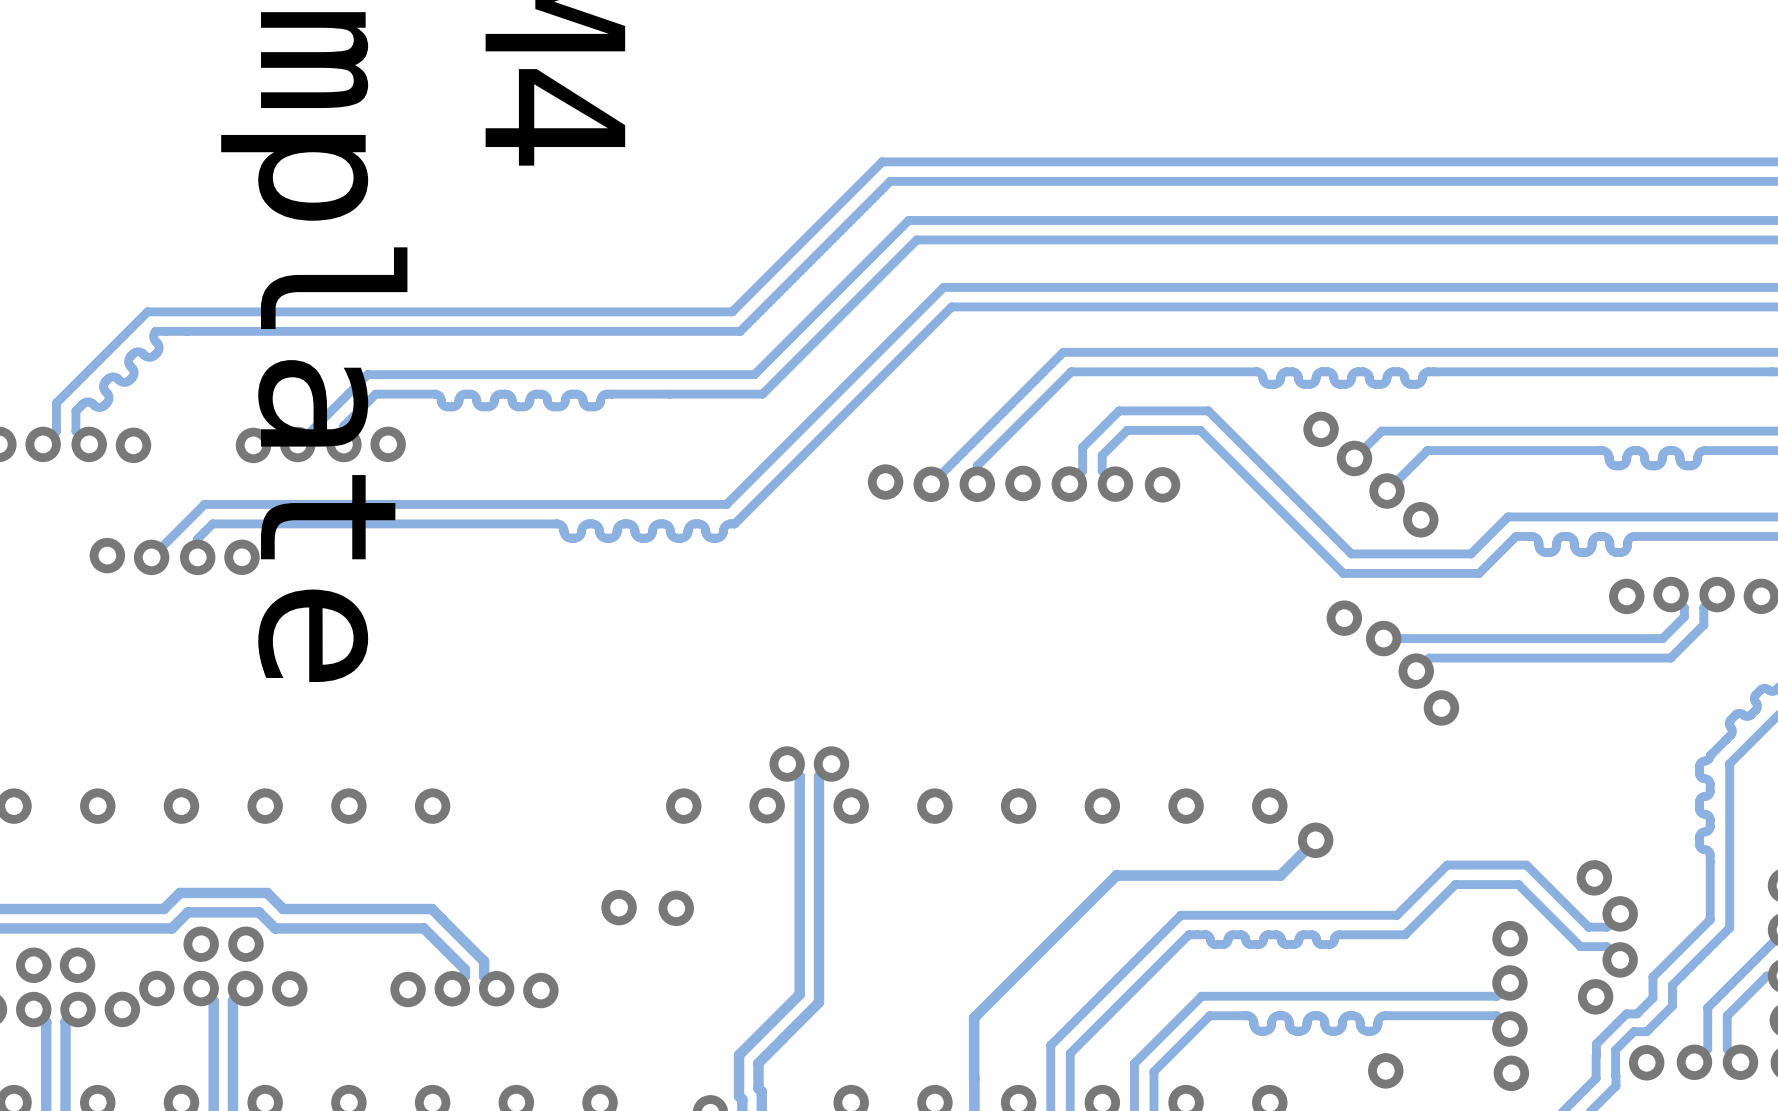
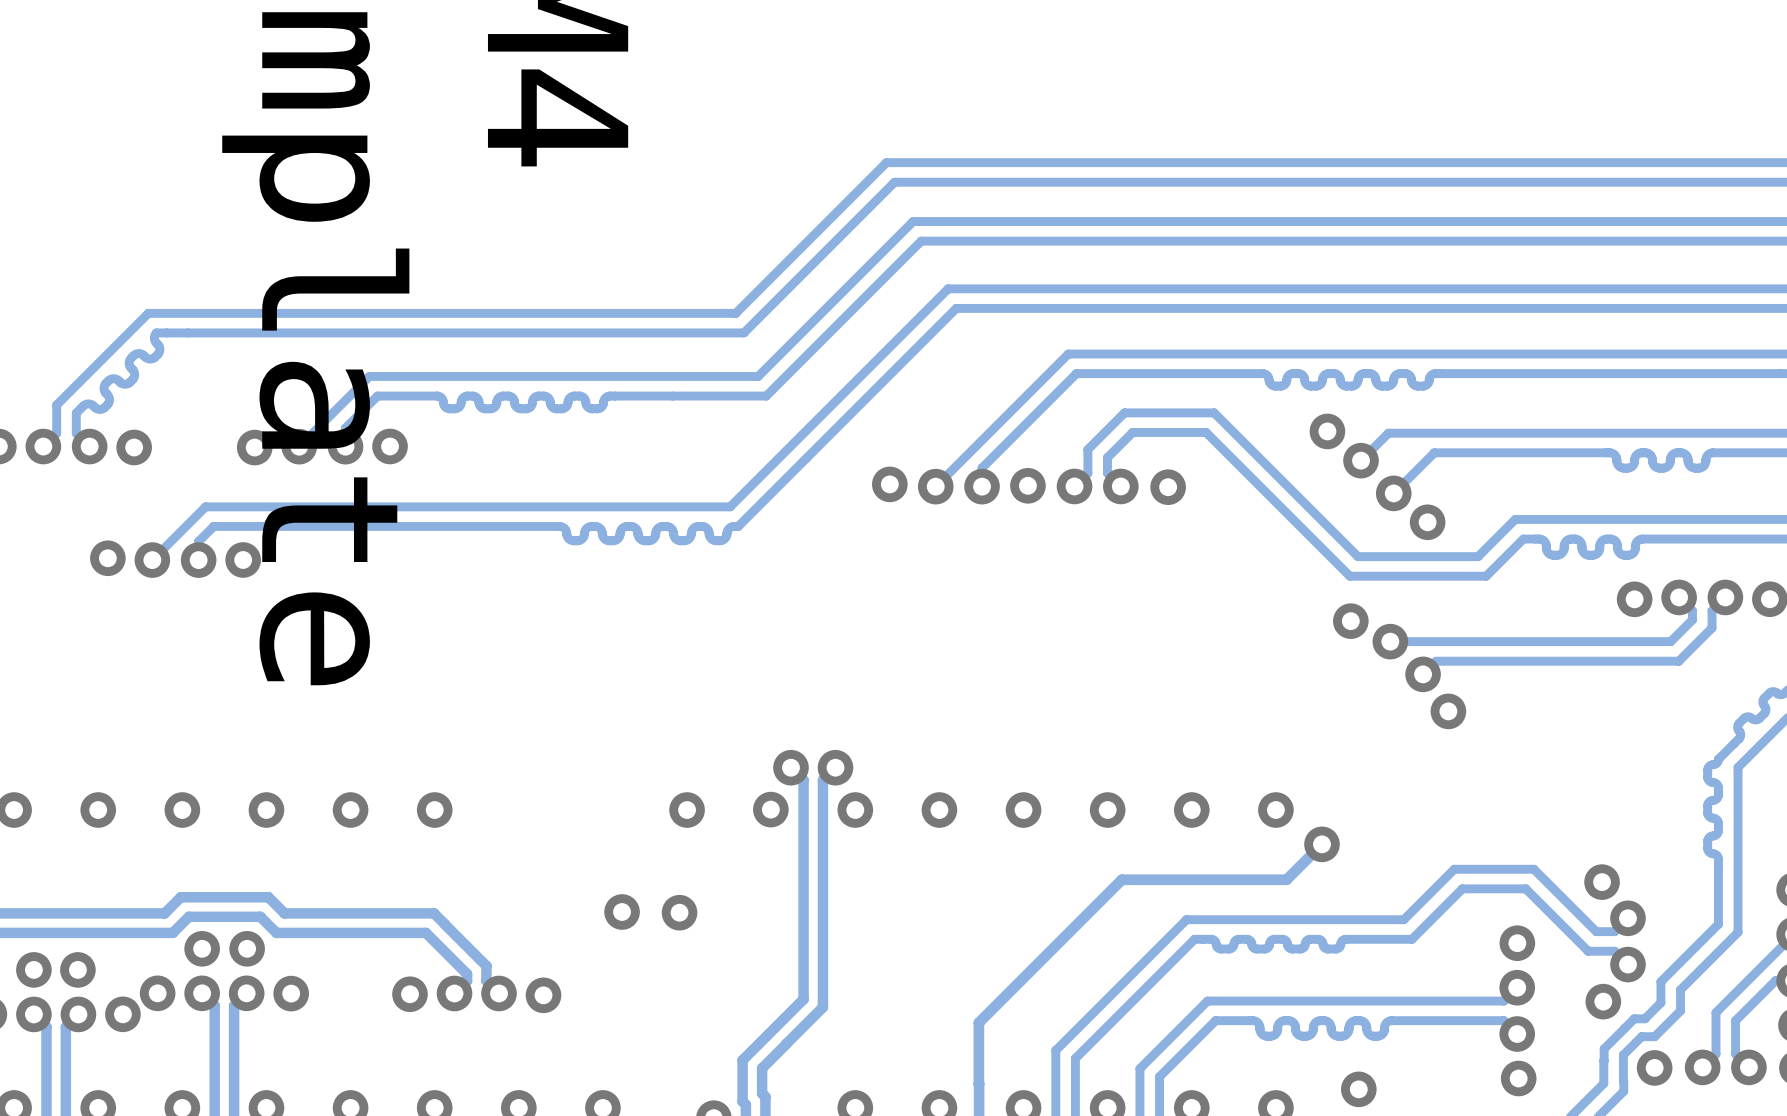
via position: (1385, 1070) -> (1358, 1089)

